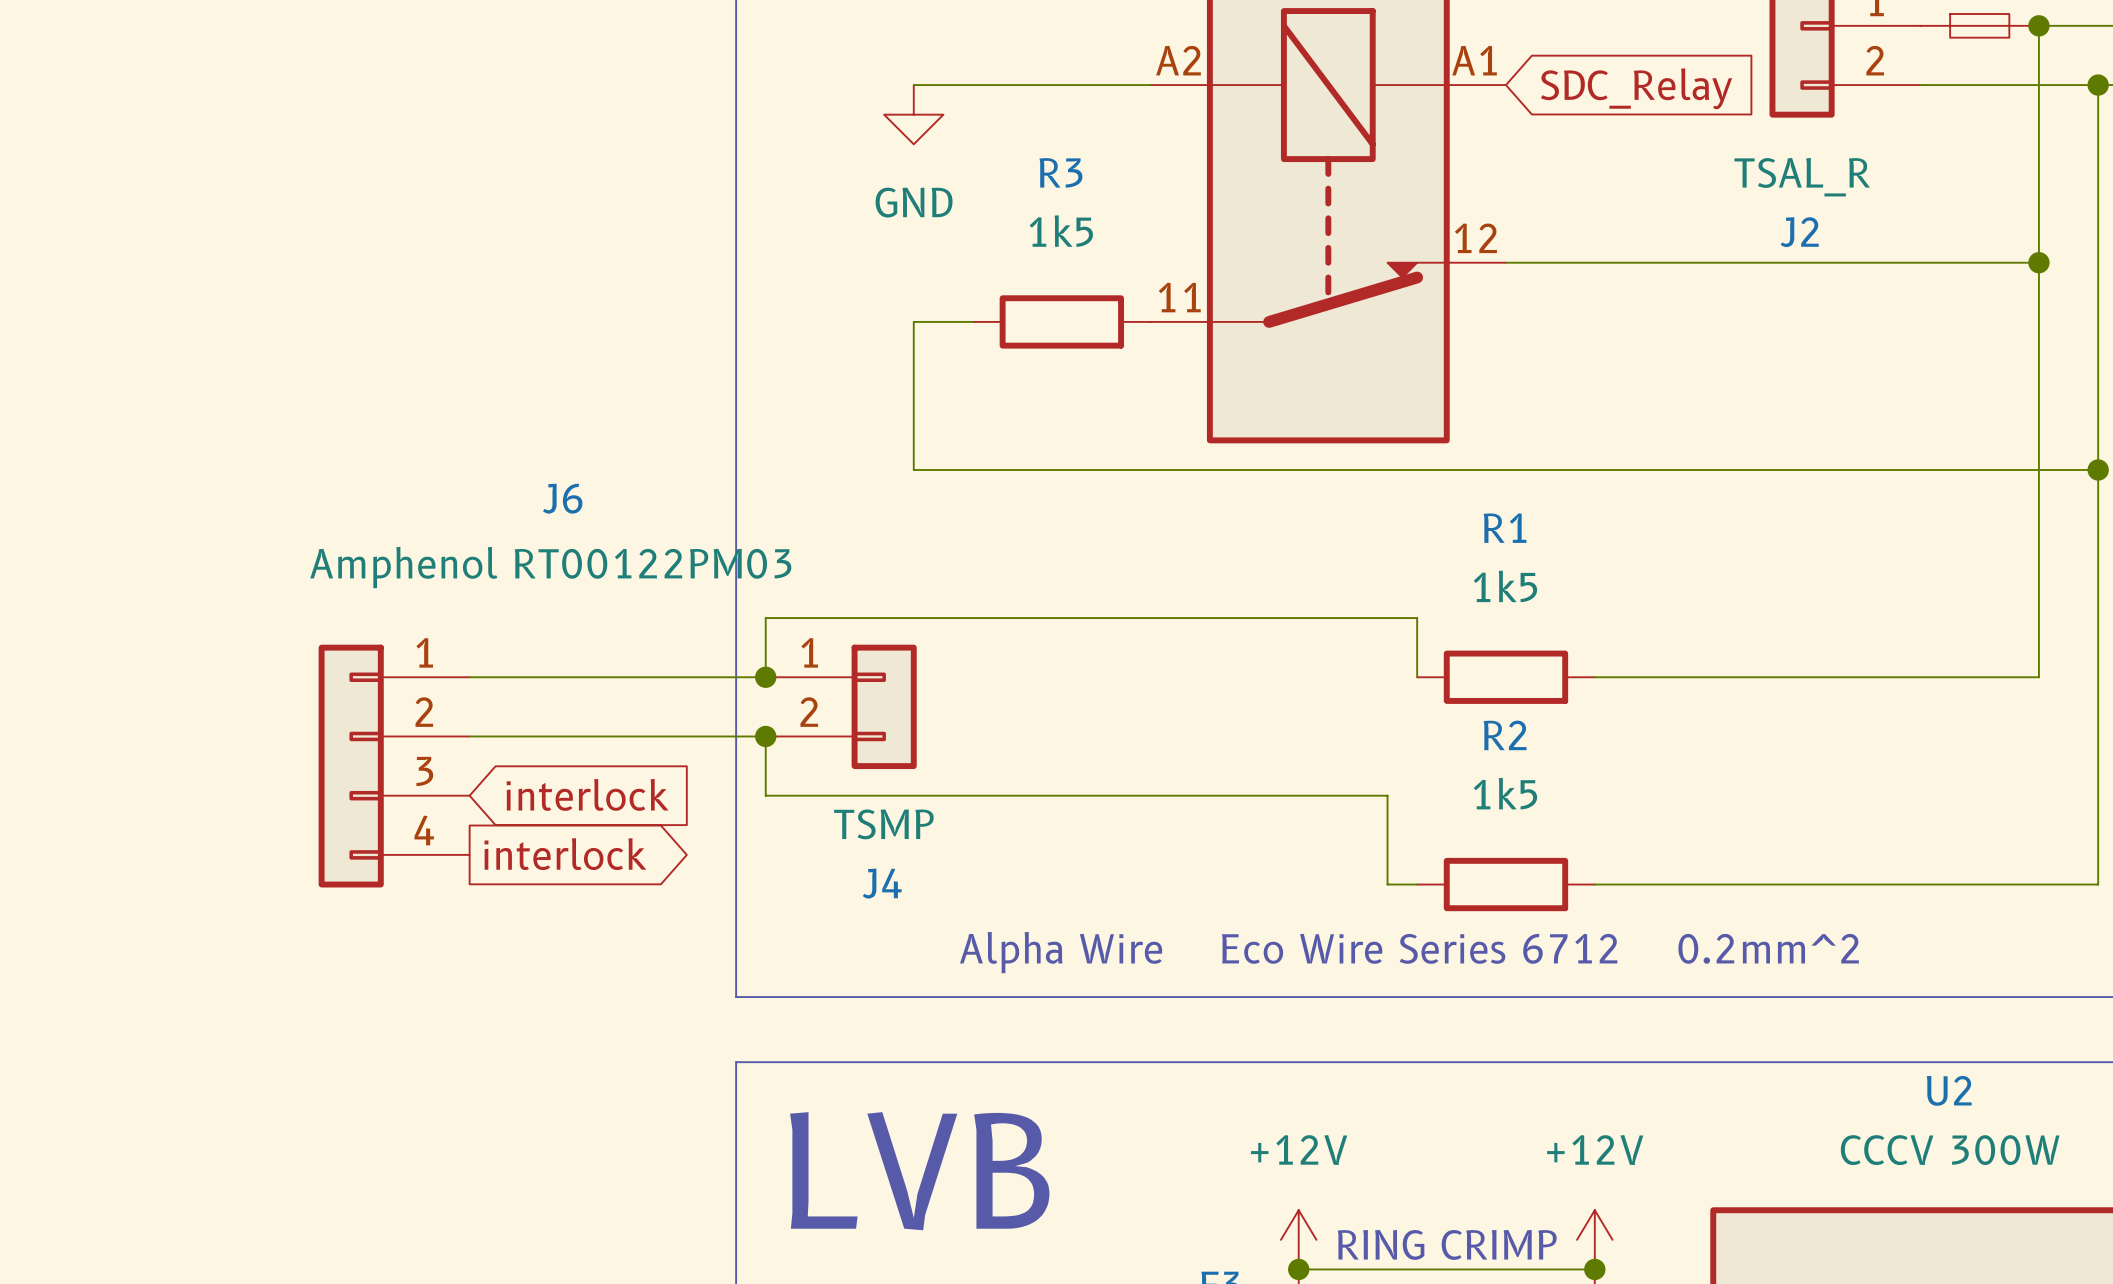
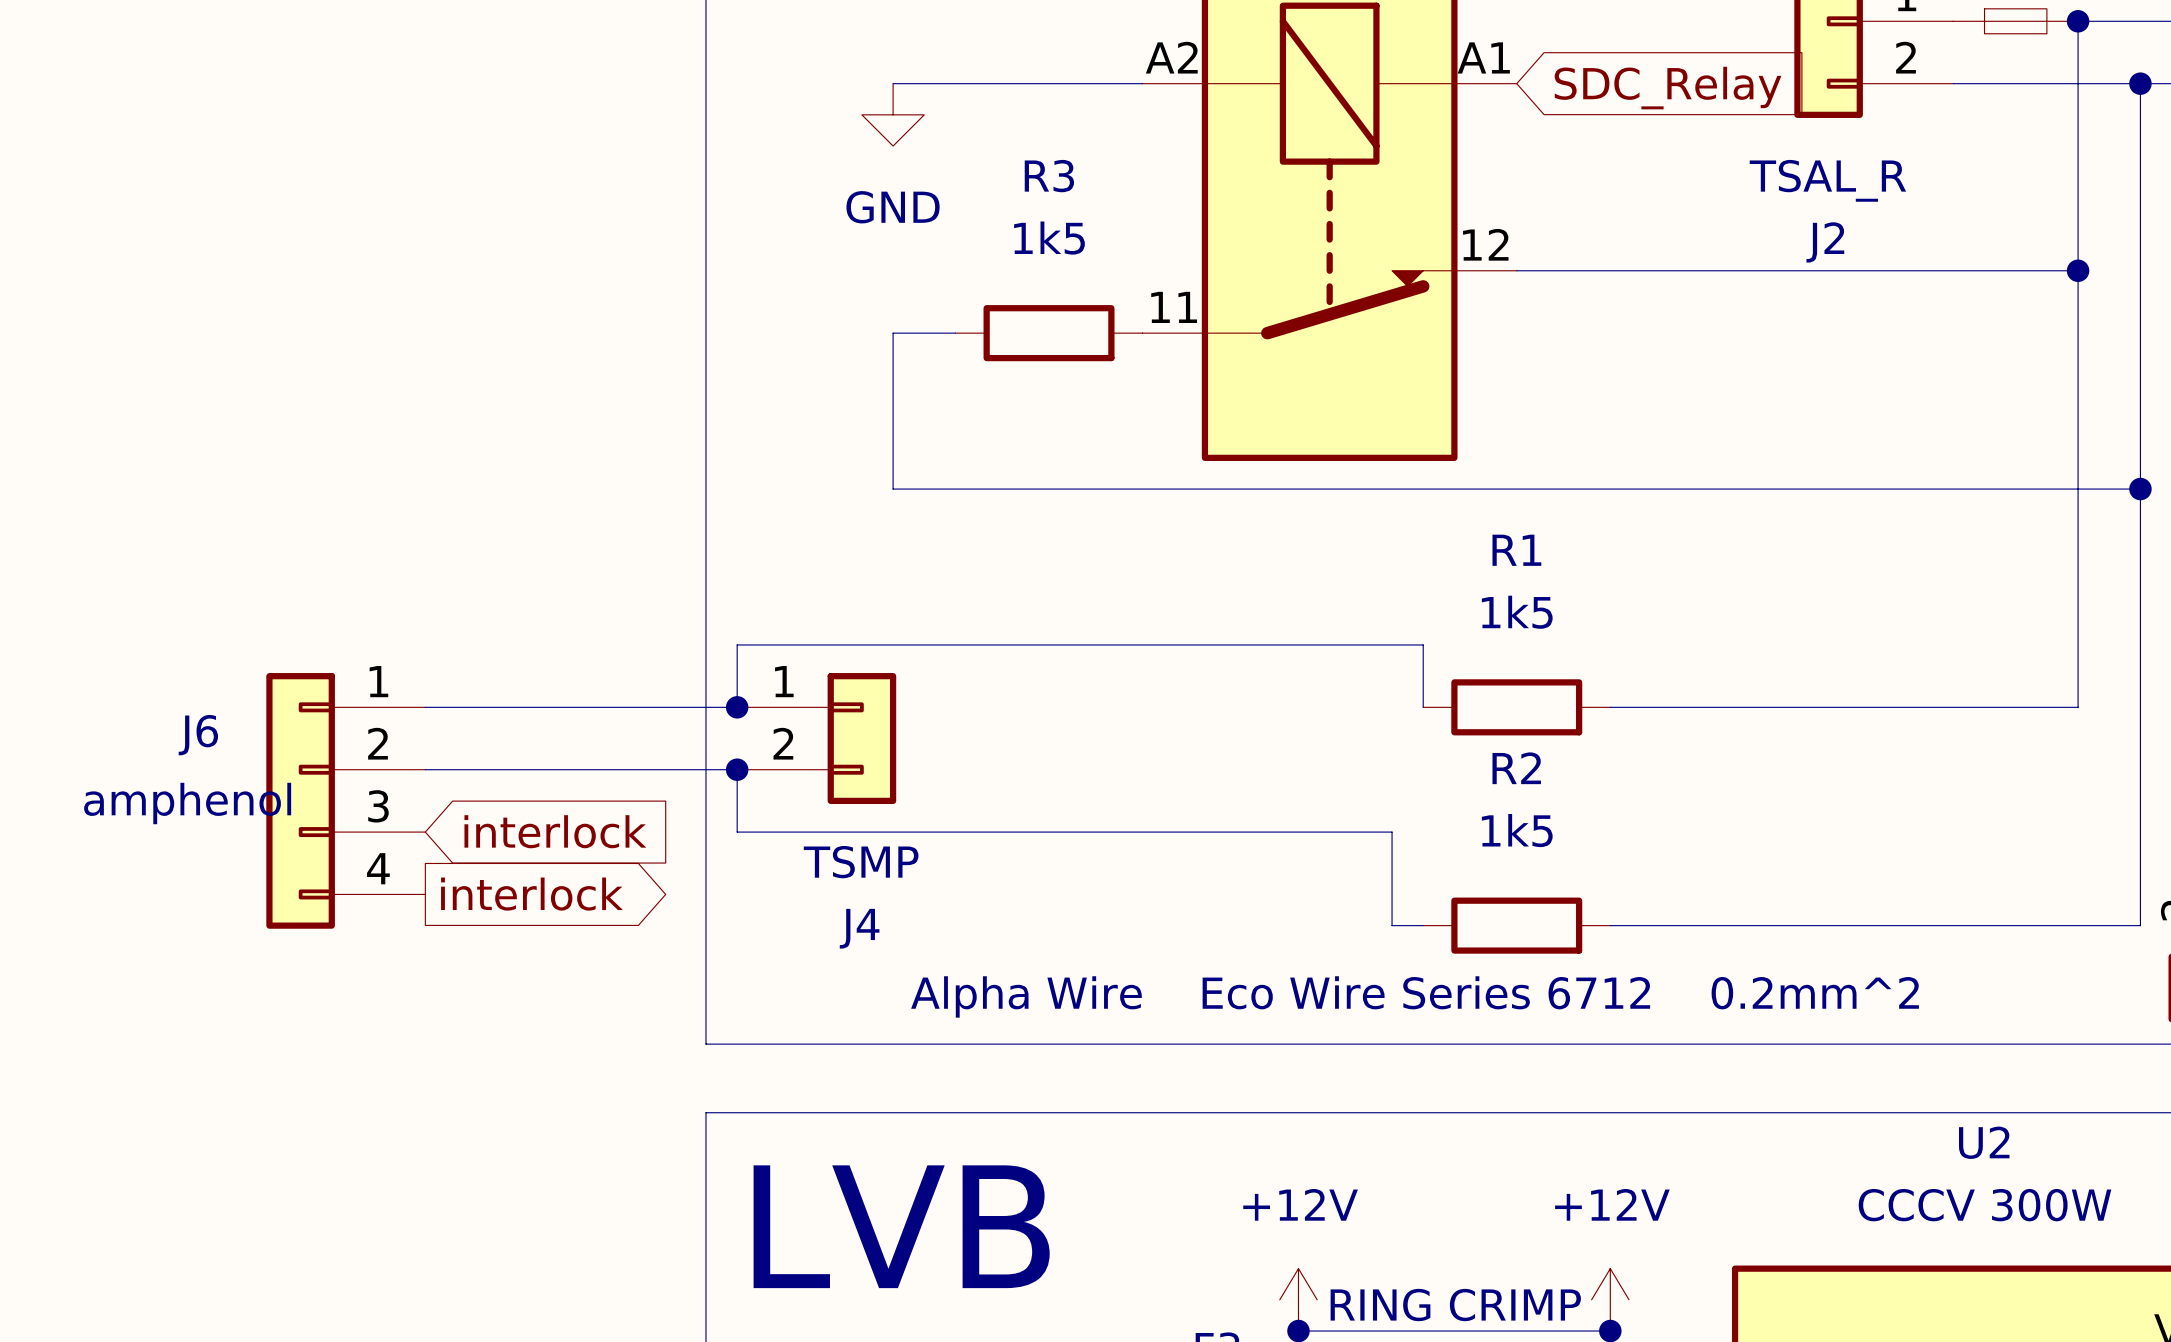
J6 name position: J6 (562, 498) -> J6 (198, 735)
J6 value: Amphenol RT00122PM03 (550, 567) -> amphenol (187, 803)

